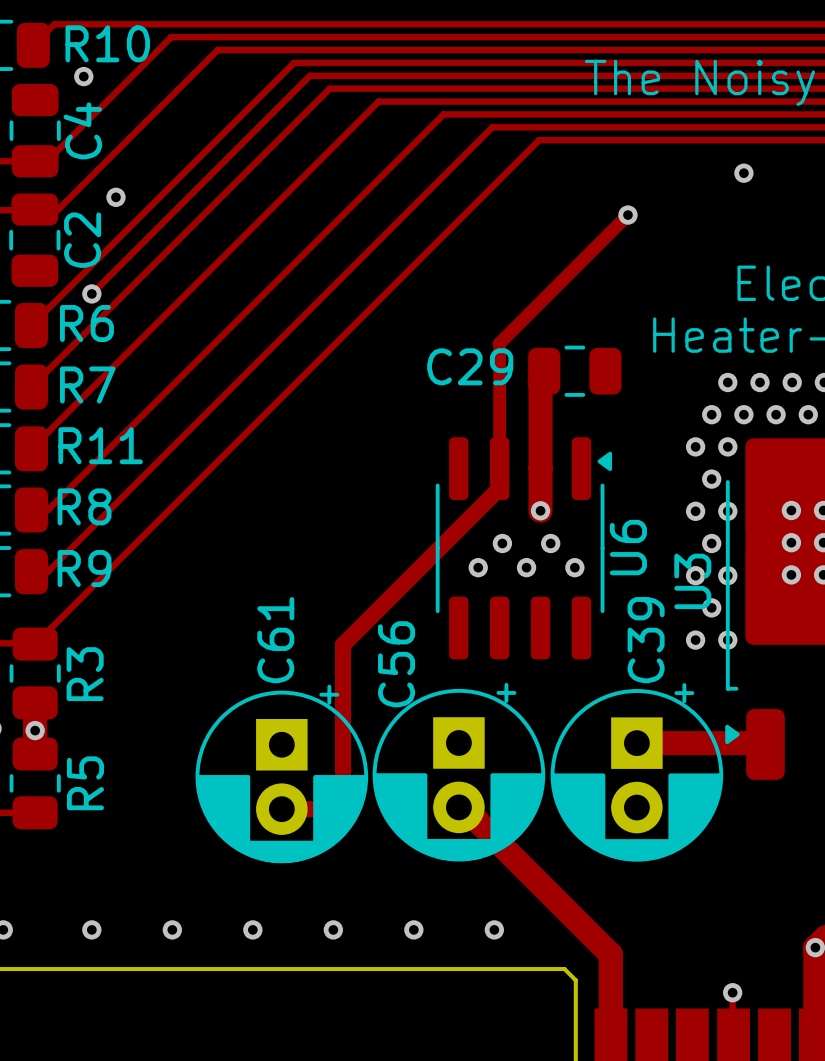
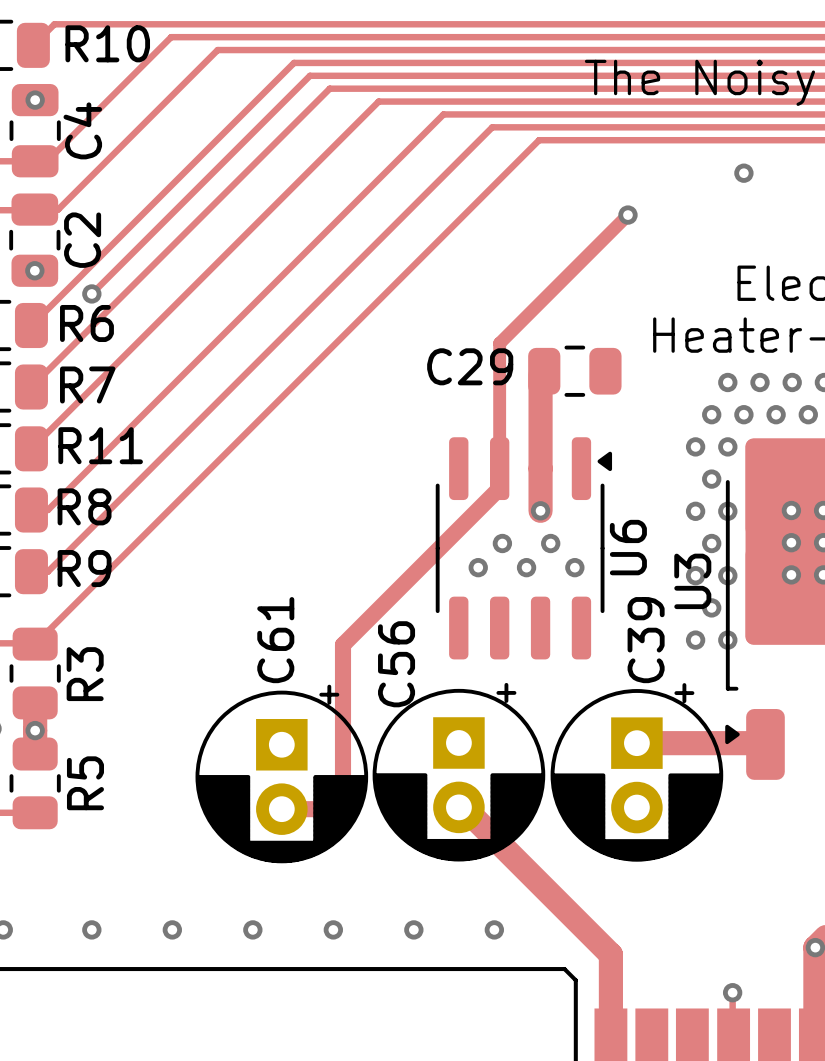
via position: (83, 76) -> (35, 100)
via: (115, 197) -> none
via: none -> (34, 270)

